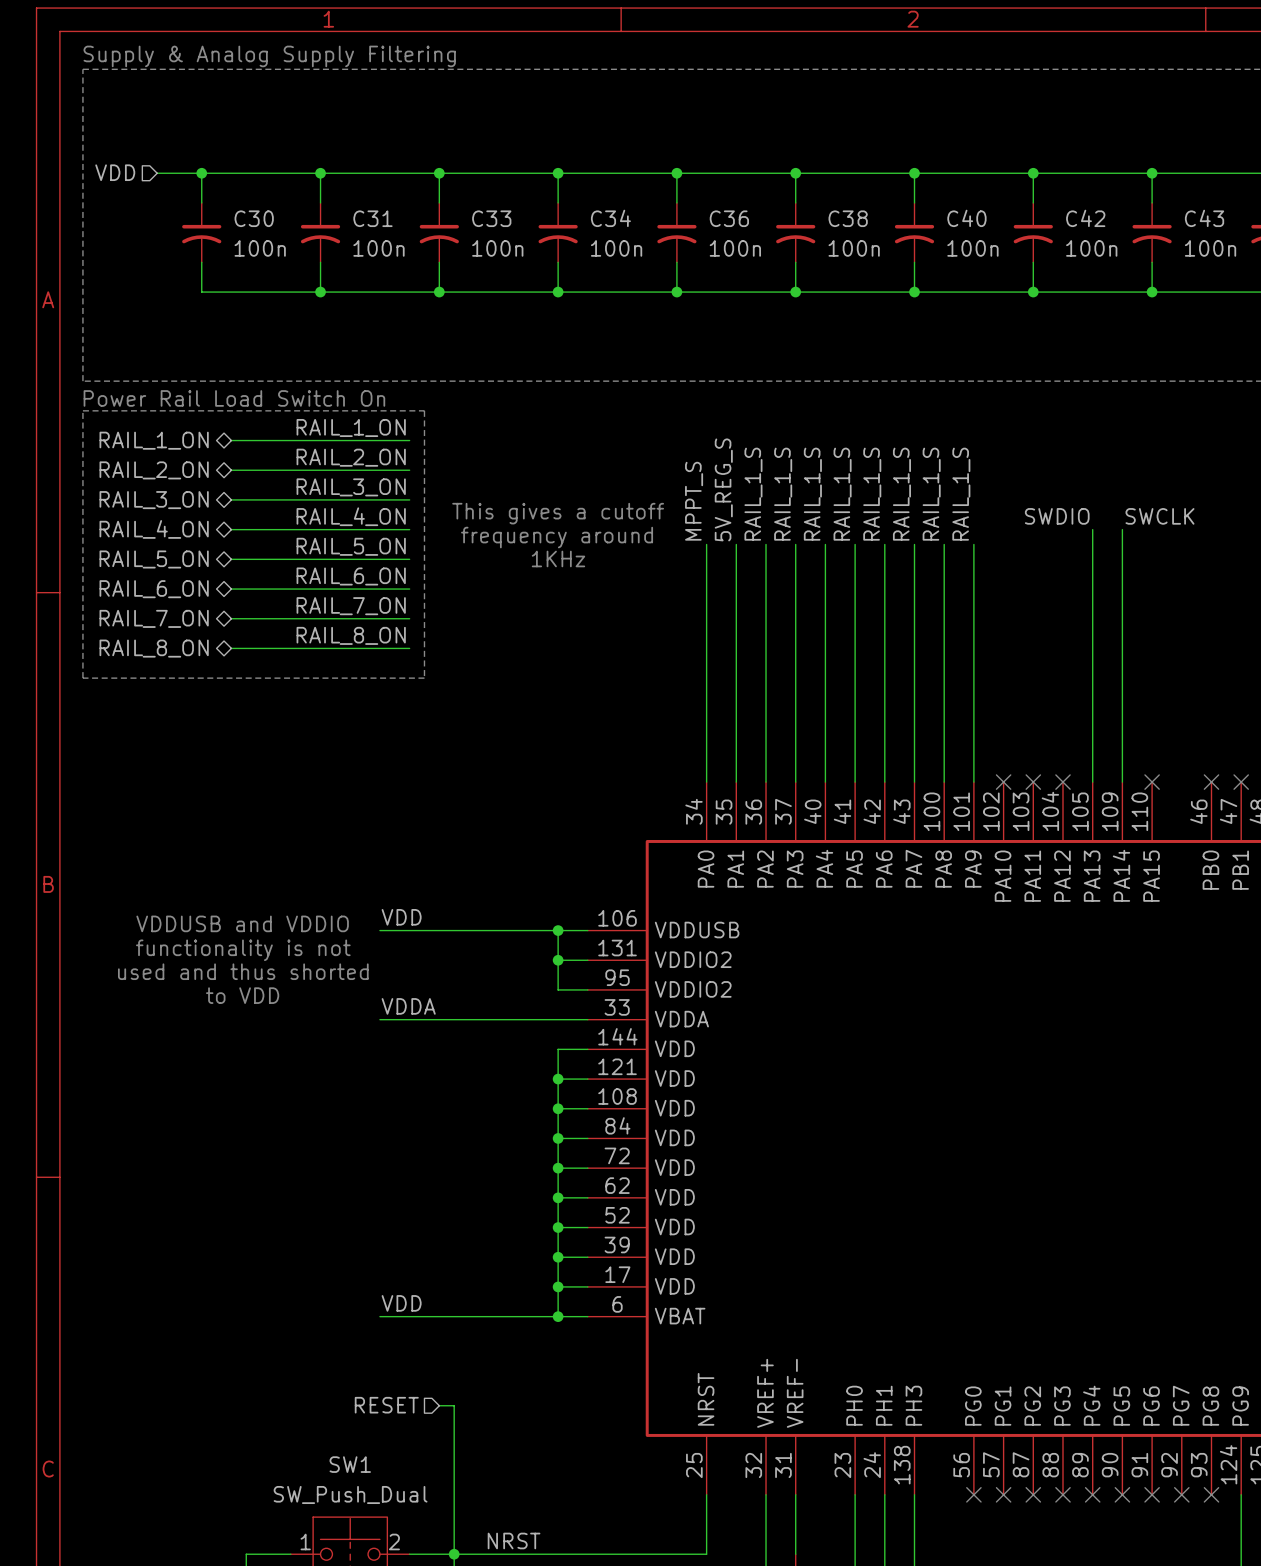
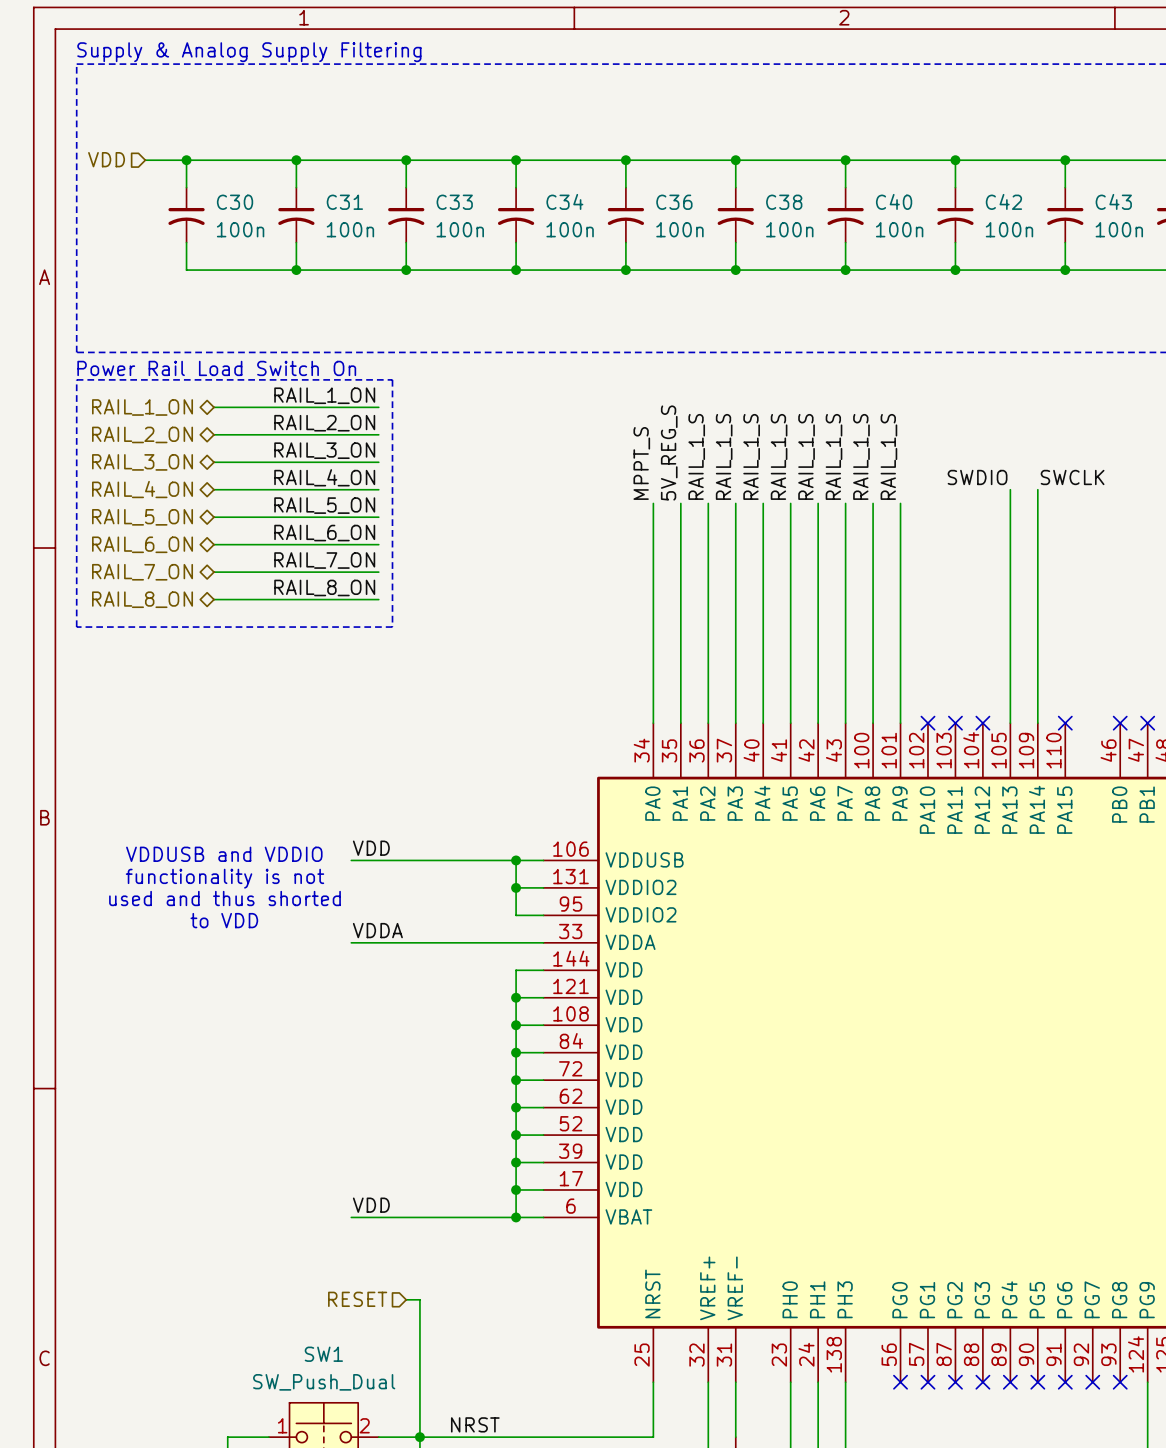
text: This gives a cutoff (558, 513) -> none
text: frequency around (557, 537) -> none
text: 1KHz (558, 558) -> none

